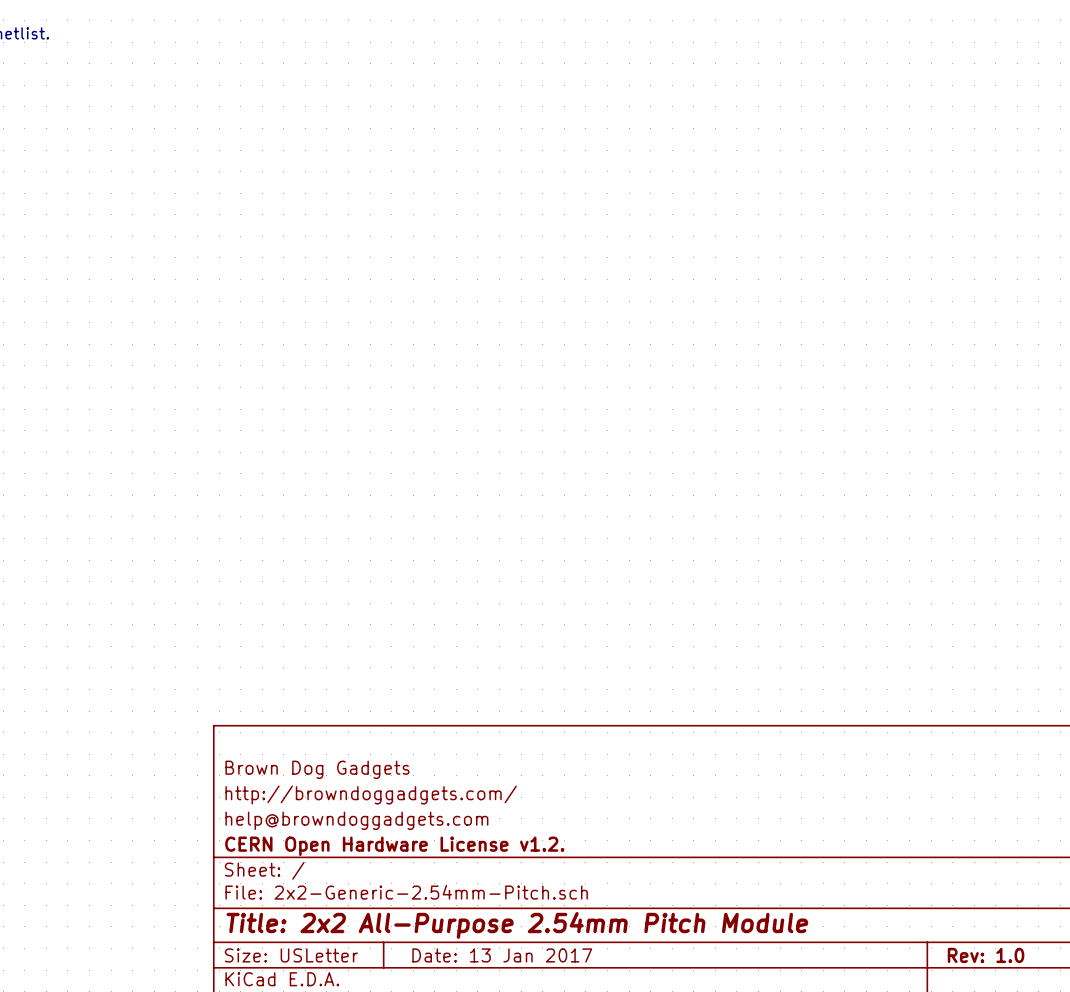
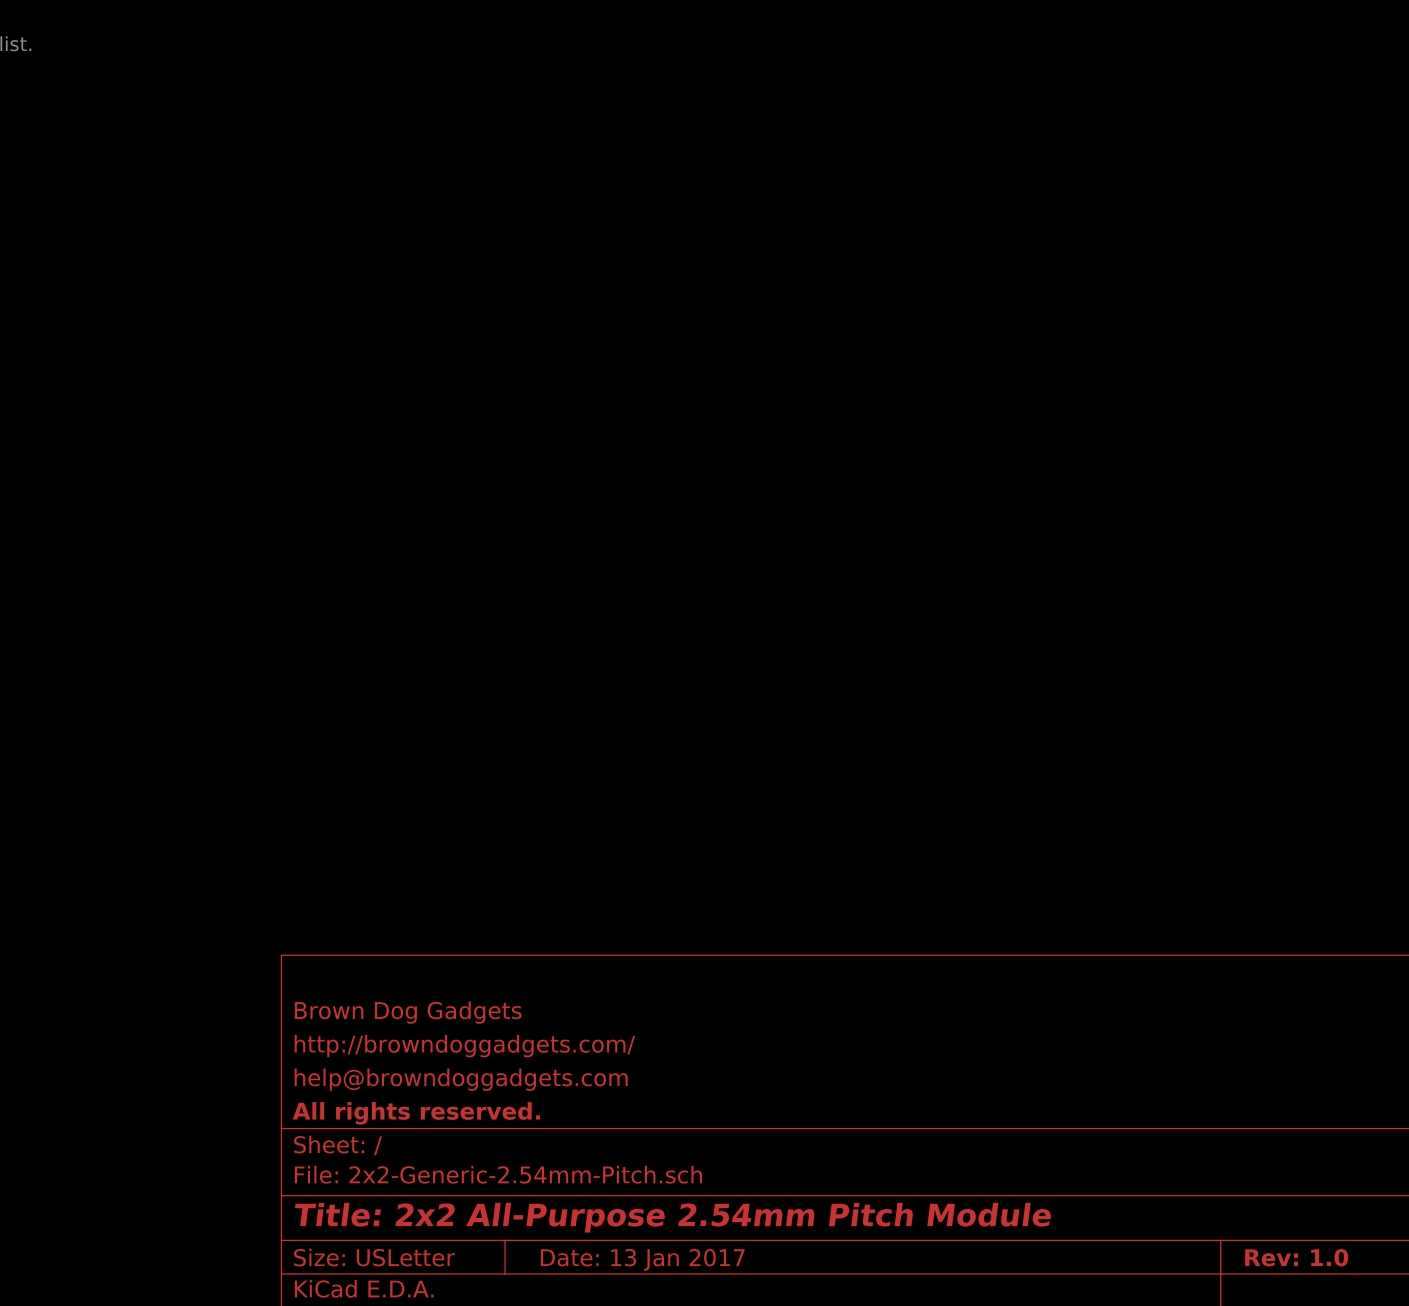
title block: CERN Open Hardware License v1.2. (394, 846) -> All rights reserved. (416, 1113)

